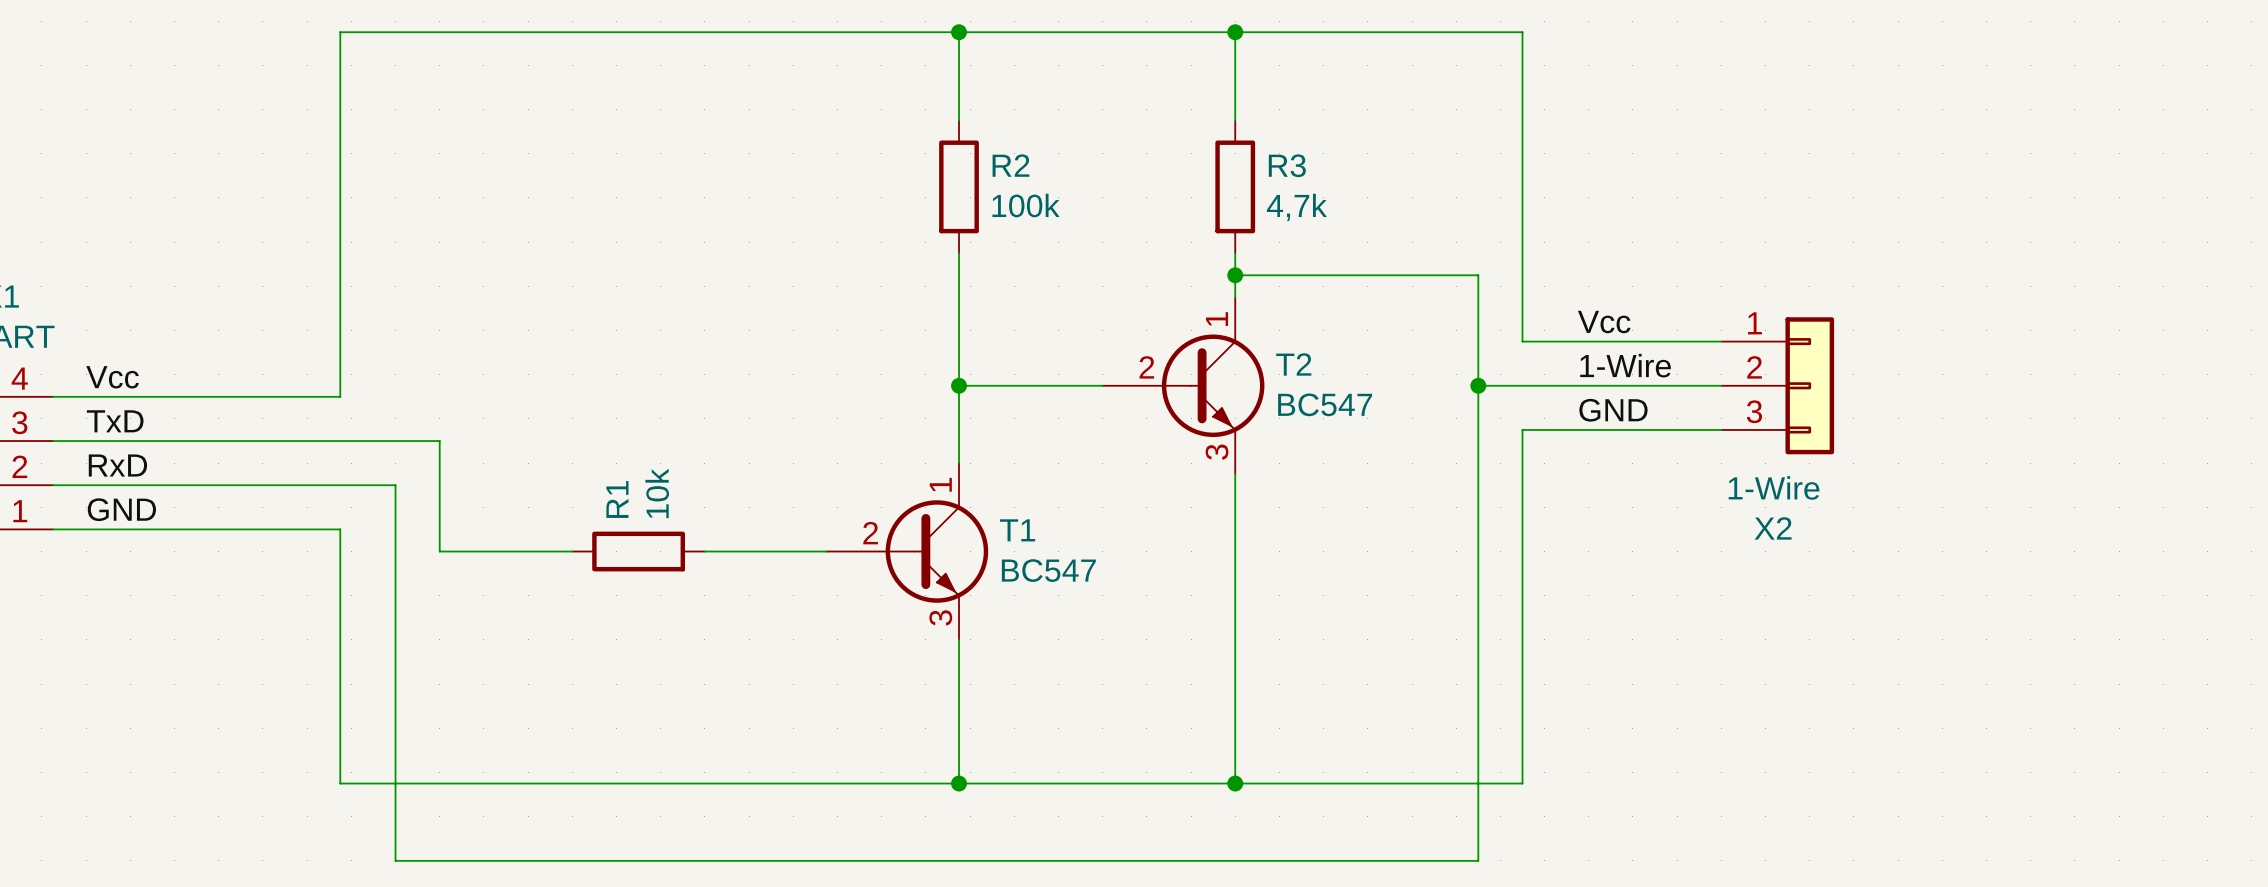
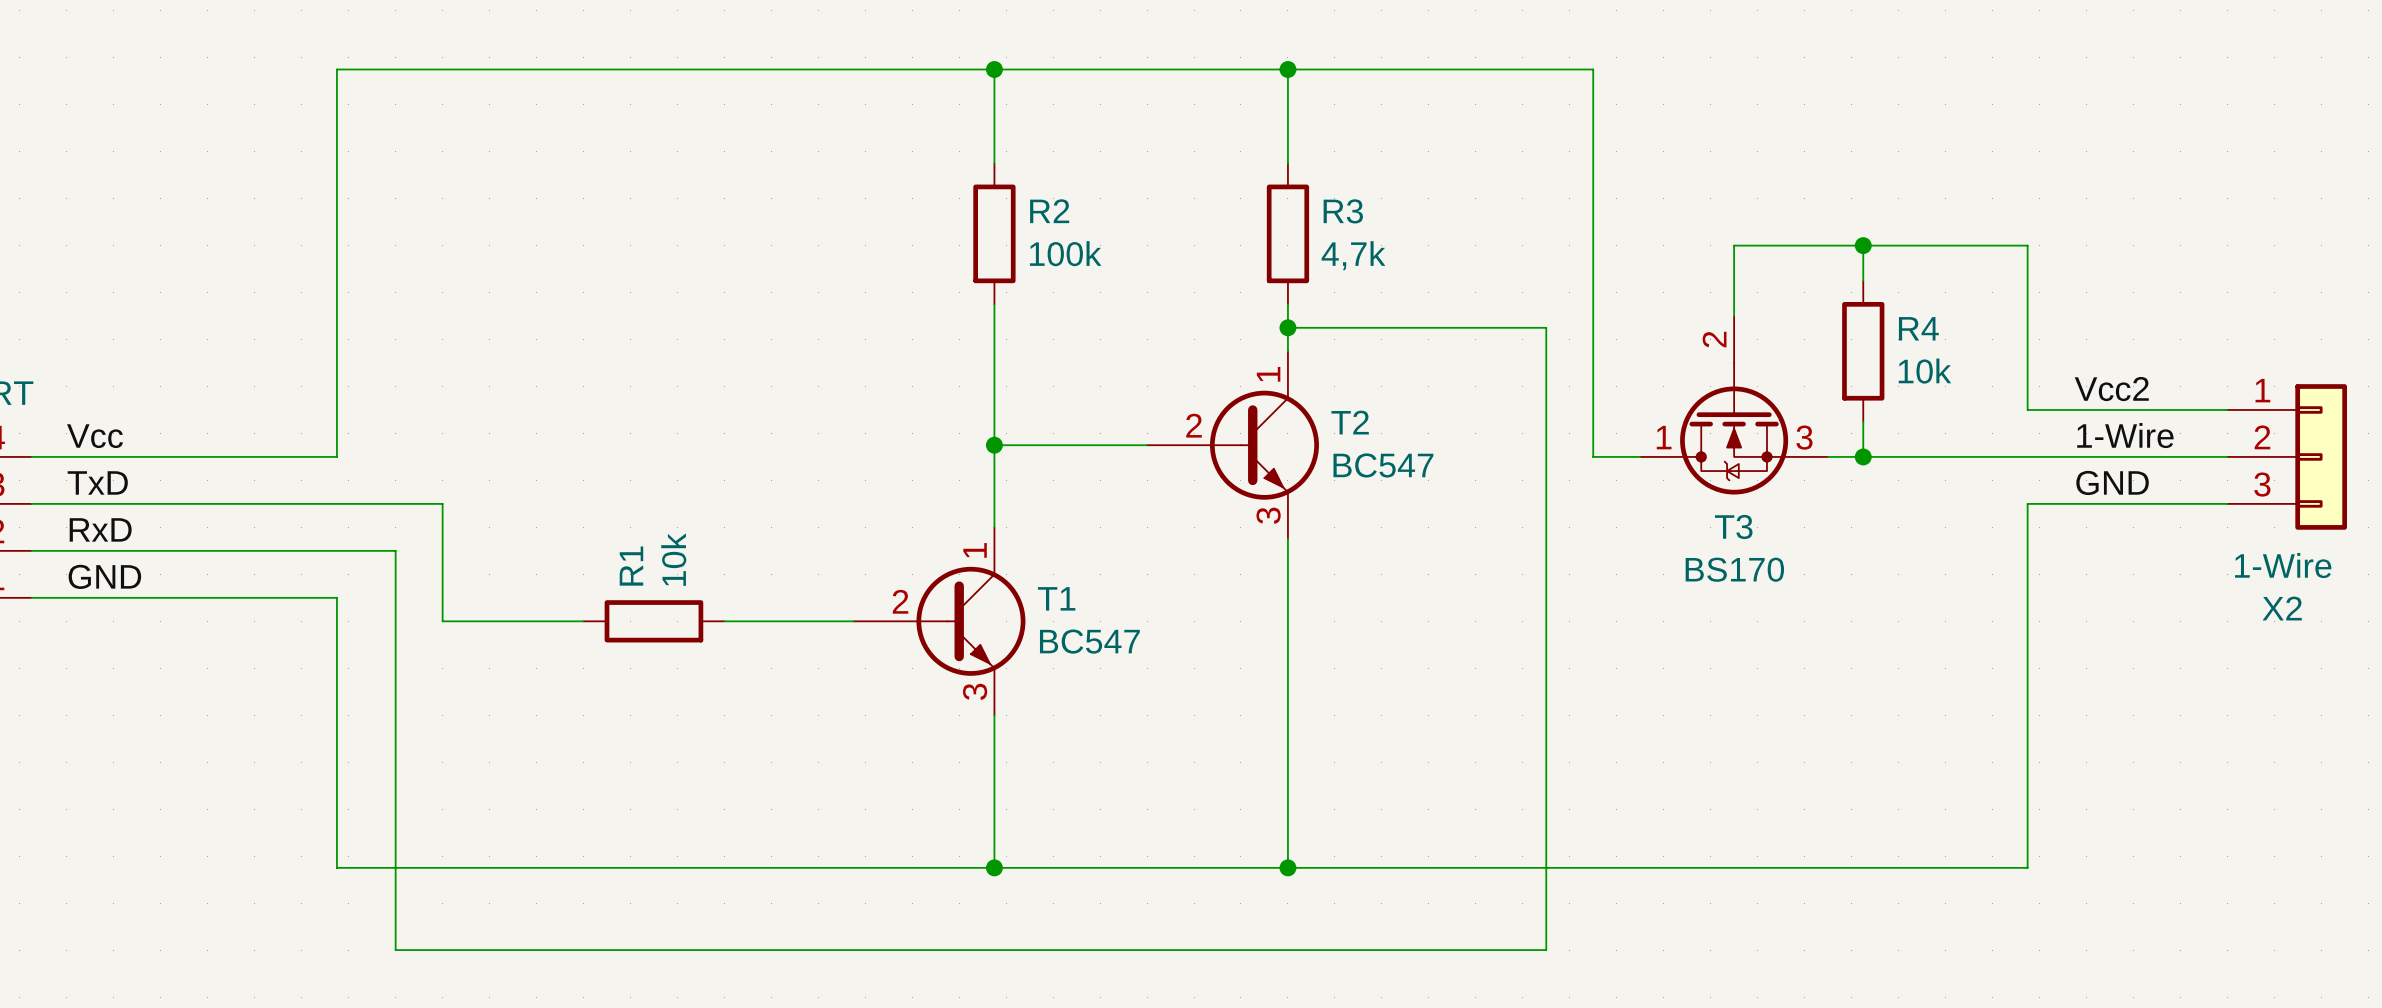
wire: none -> (1863, 245) (1863, 280)
junction: none -> (1863, 245)
wire: none -> (1734, 316) (1734, 245) (2027, 245) (2027, 409) (2227, 409)
R4: none -> 10k (1863, 351)
label: Vcc (1604, 322) -> none
label: none -> Vcc2 (2111, 389)
wire: (1522, 341) (1721, 341) -> (1593, 398) (1593, 456) (1640, 456)
T3: none -> BS170 (1734, 405)
wire: none -> (1863, 421) (1863, 456)
label position: 1-Wire (1625, 365) -> 1-Wire (2125, 435)
wire: (1478, 385) (1721, 385) -> none
junction: (1478, 385) -> none
X2 position: (1777, 385) -> (2287, 456)
wire: none -> (1828, 456) (2227, 456)
junction: none -> (1863, 456)
label position: GND (1613, 410) -> GND (2112, 482)
wire: (1721, 429) (1522, 429) (1522, 783) -> (2227, 503) (2027, 503) (2027, 867) (1593, 867)

